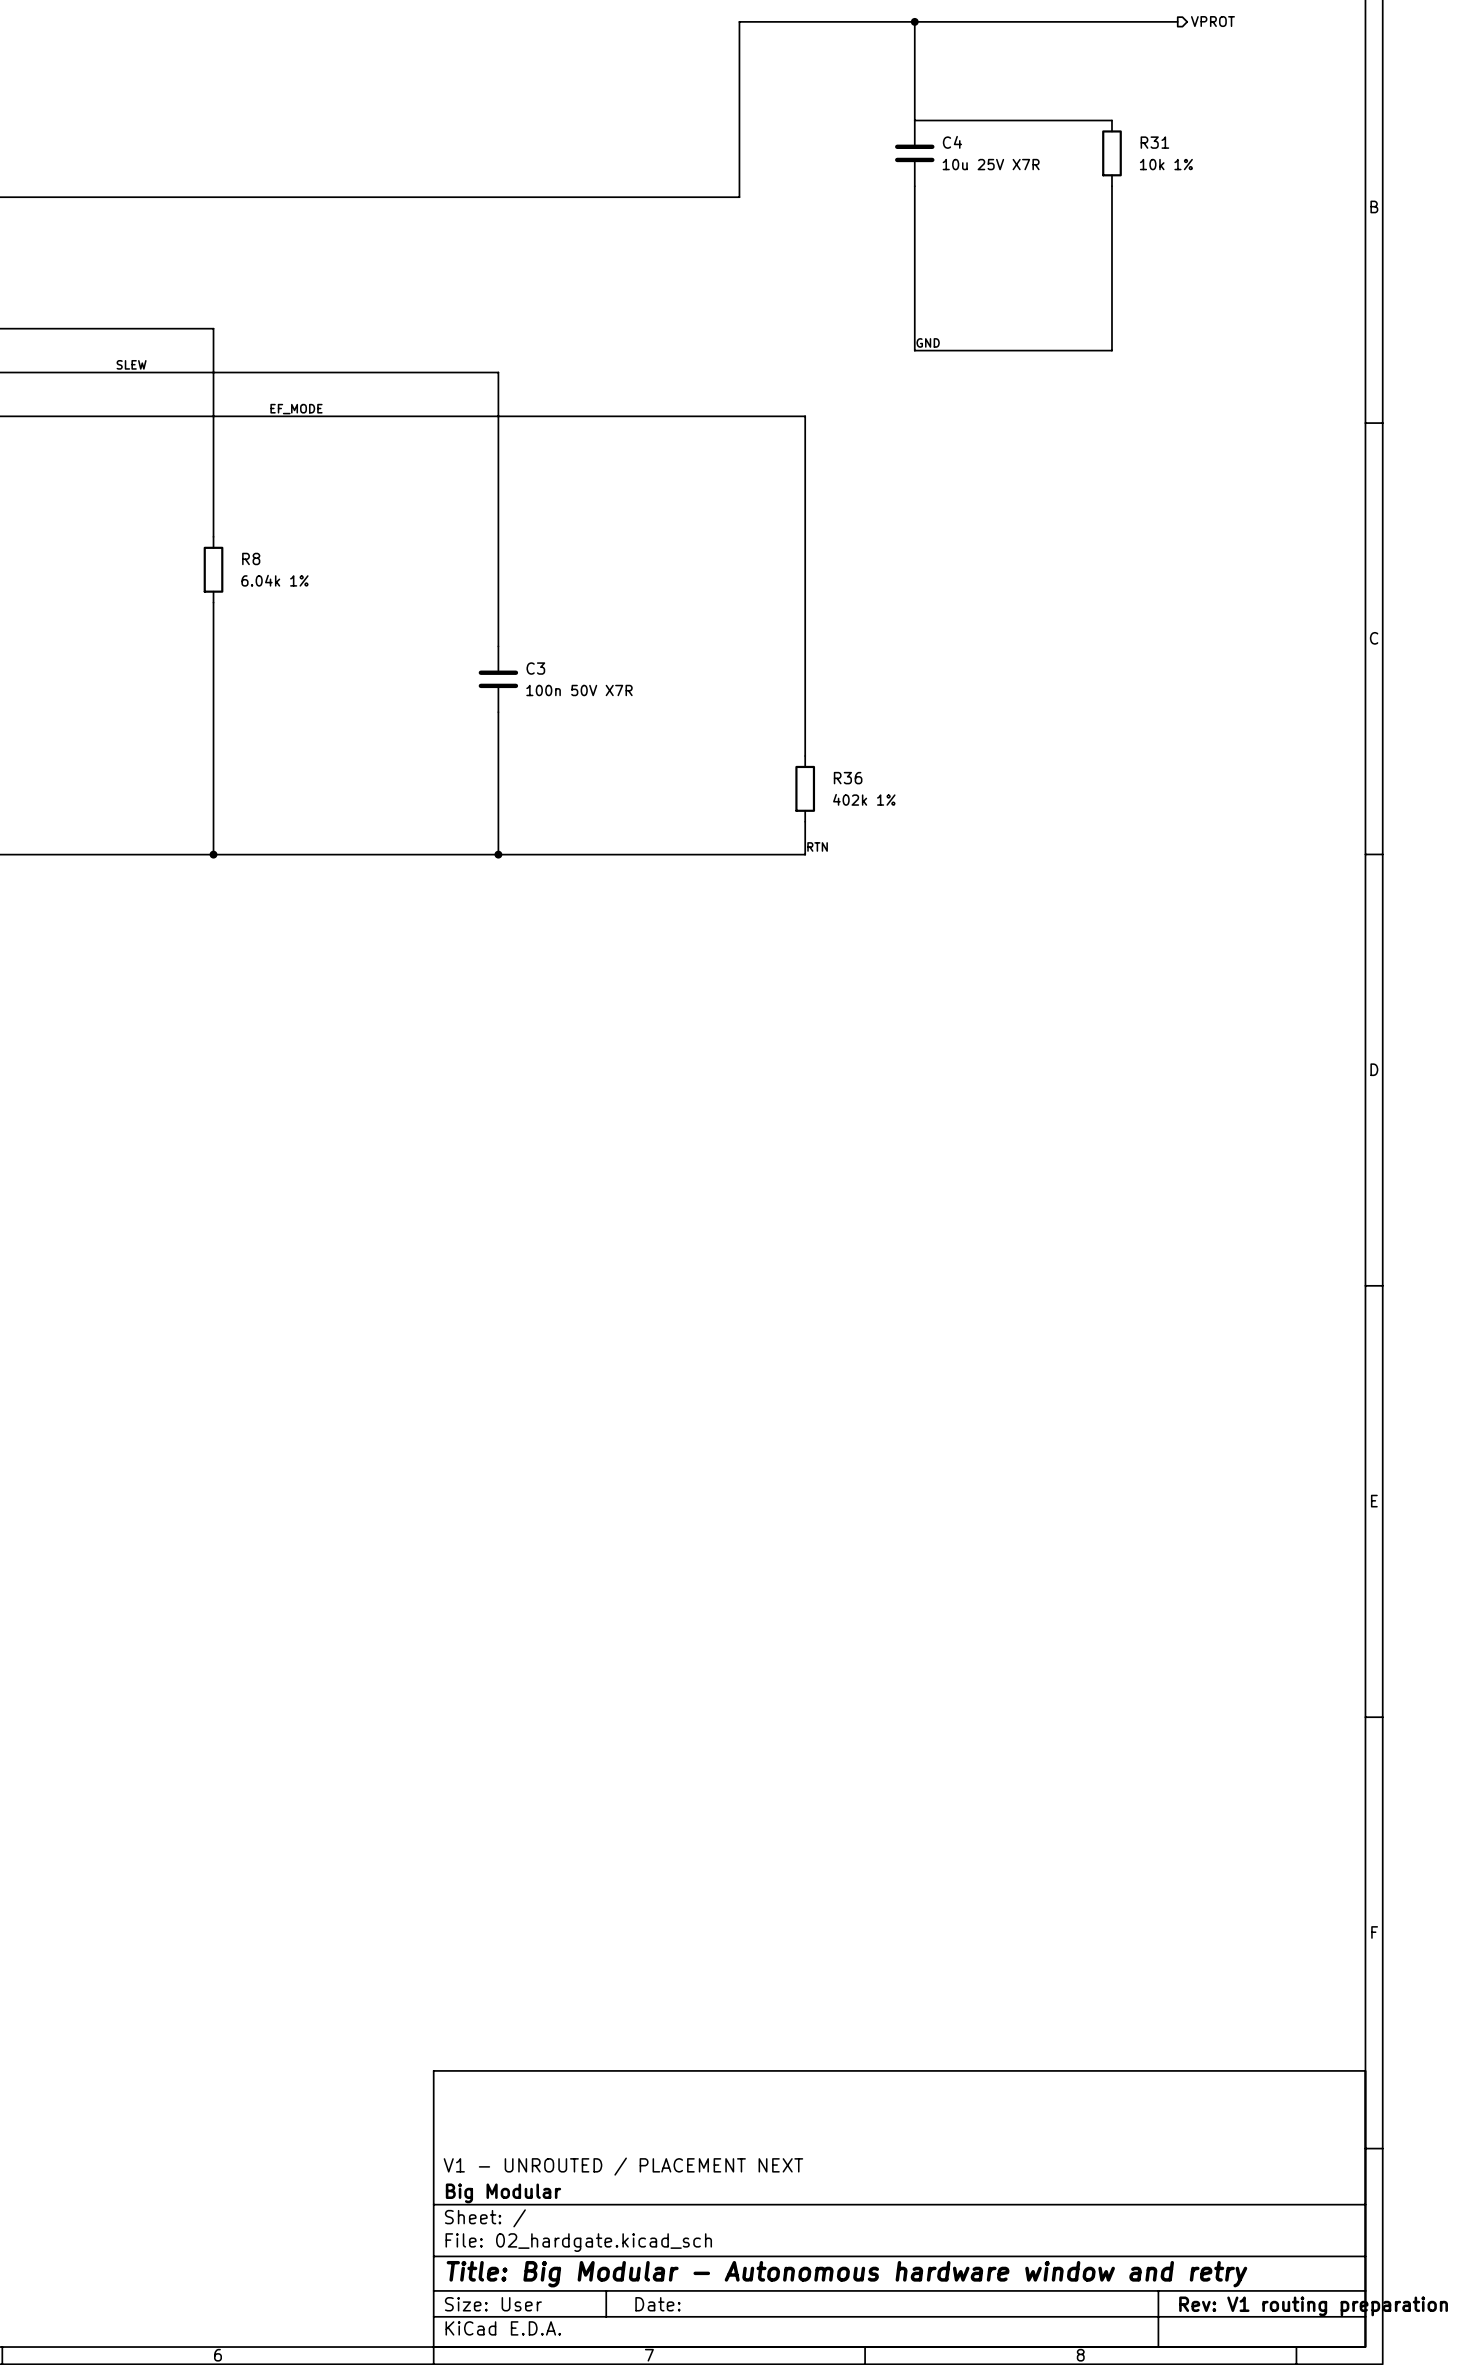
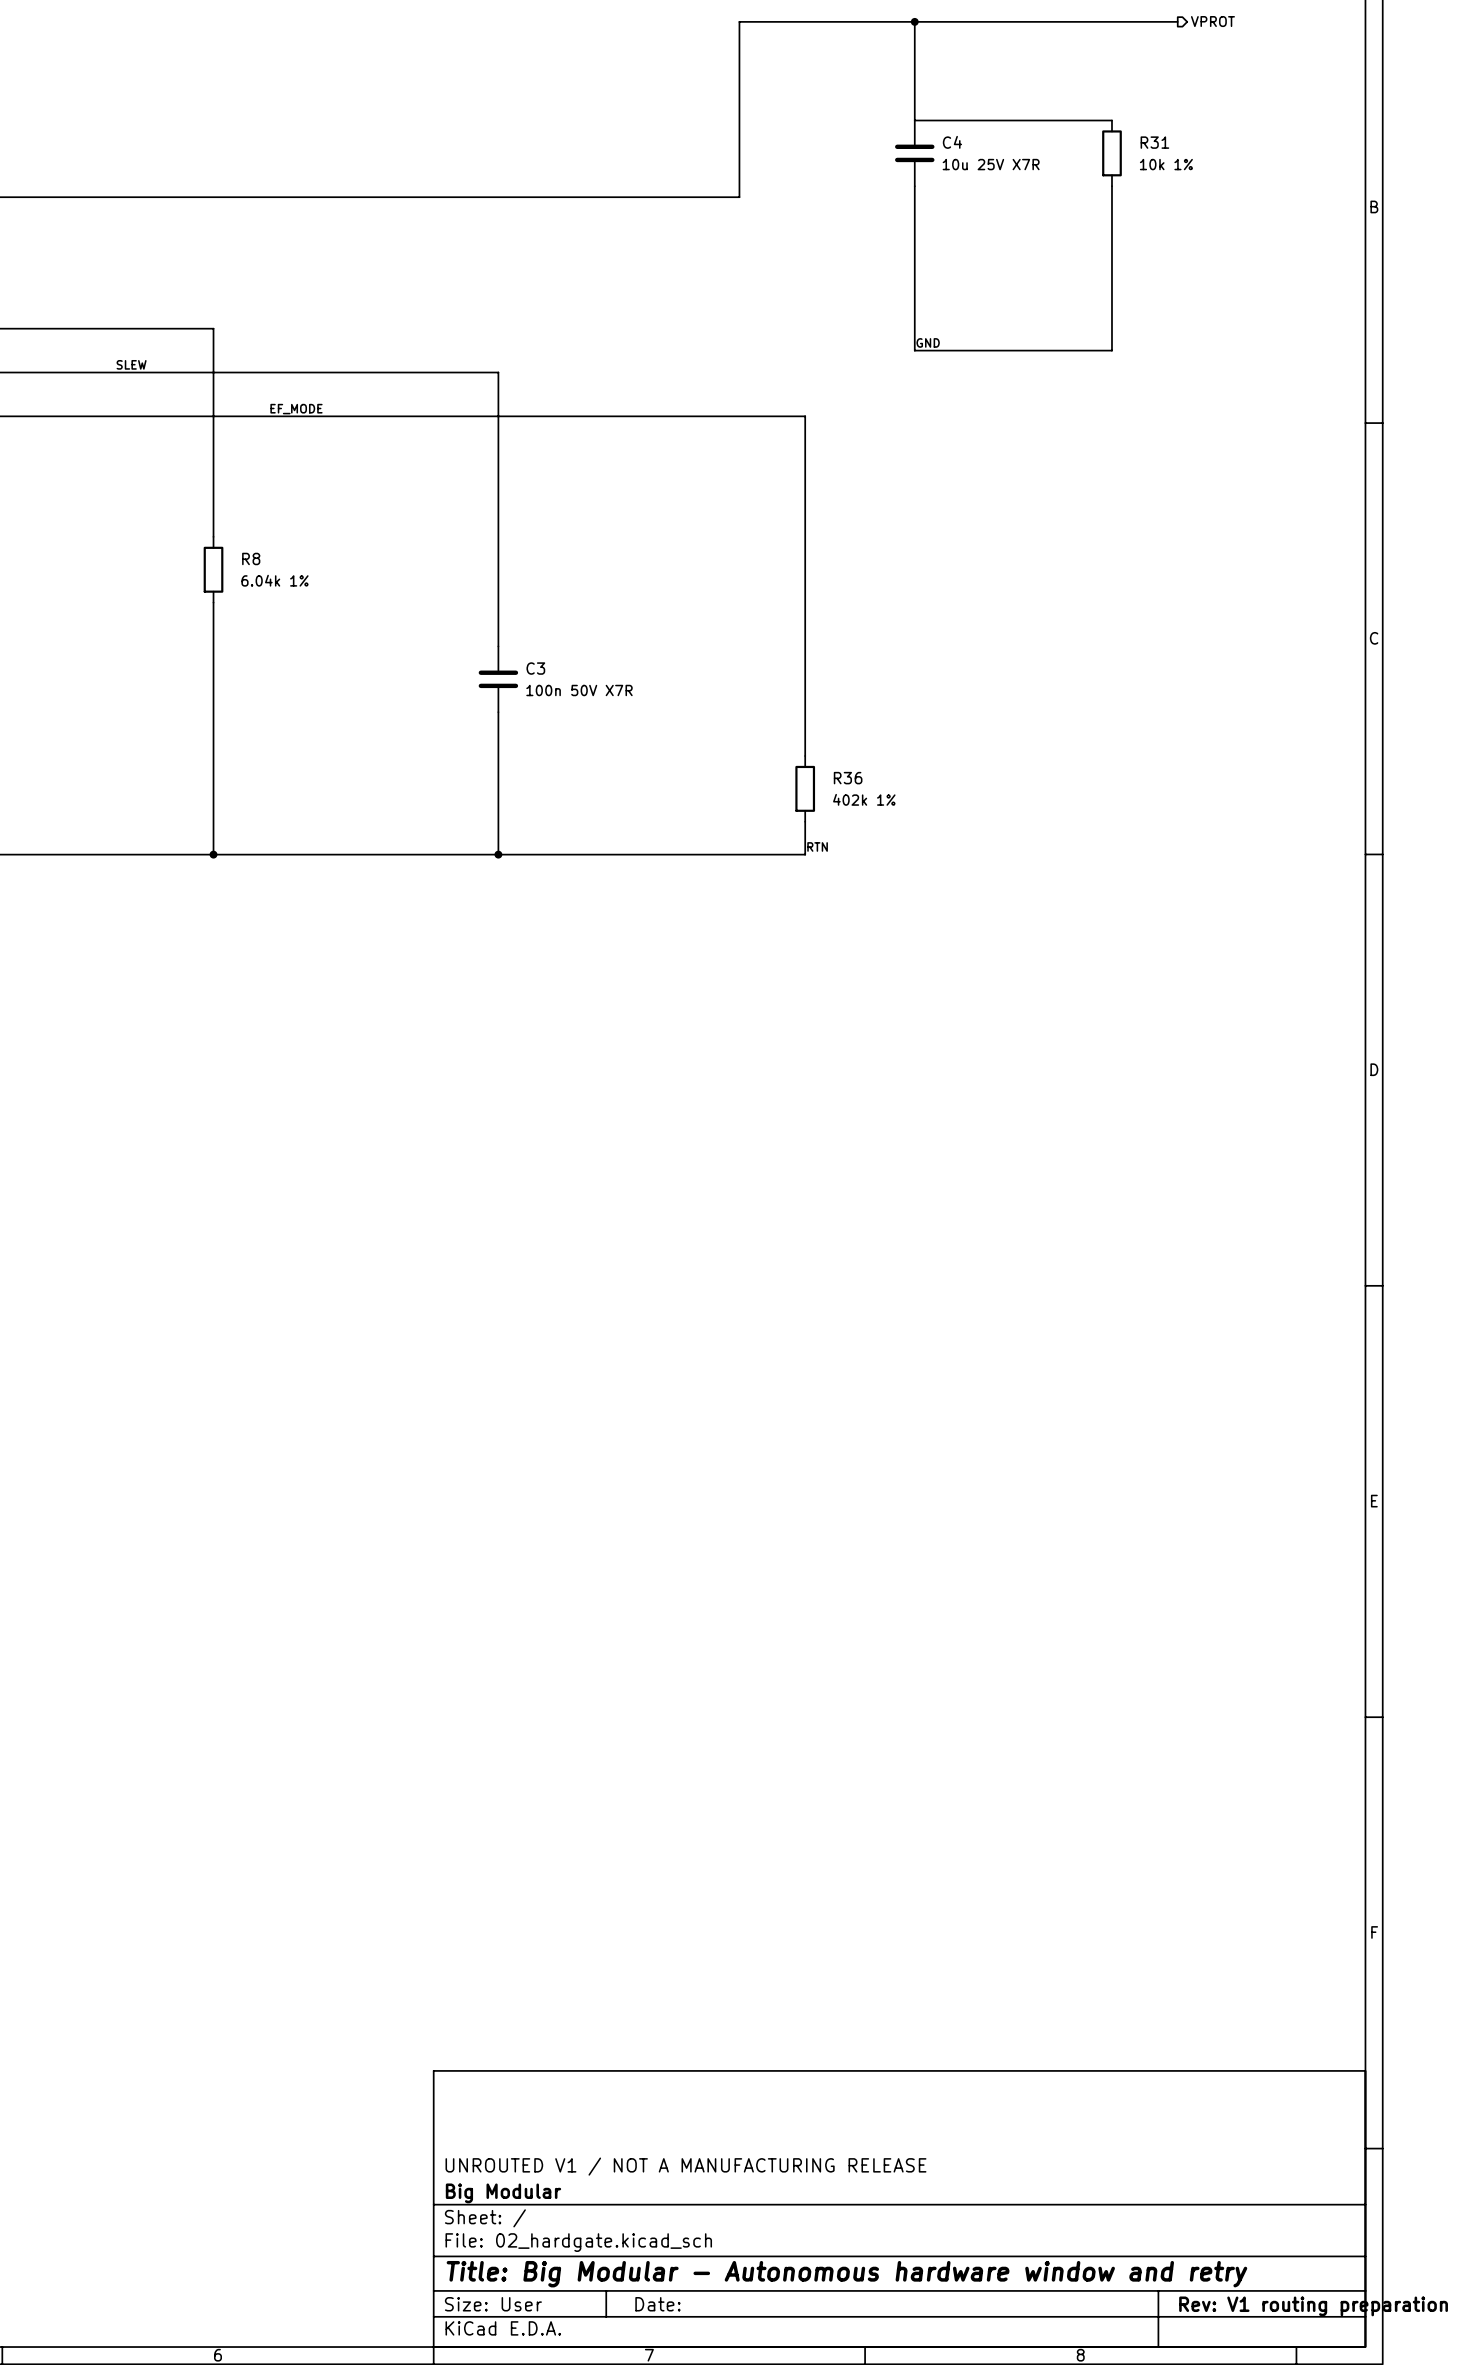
title block: V1 - UNROUTED / PLACEMENT NEXT (623, 2166) -> UNROUTED V1 / NOT A MANUFACTURING RELEASE (685, 2166)

